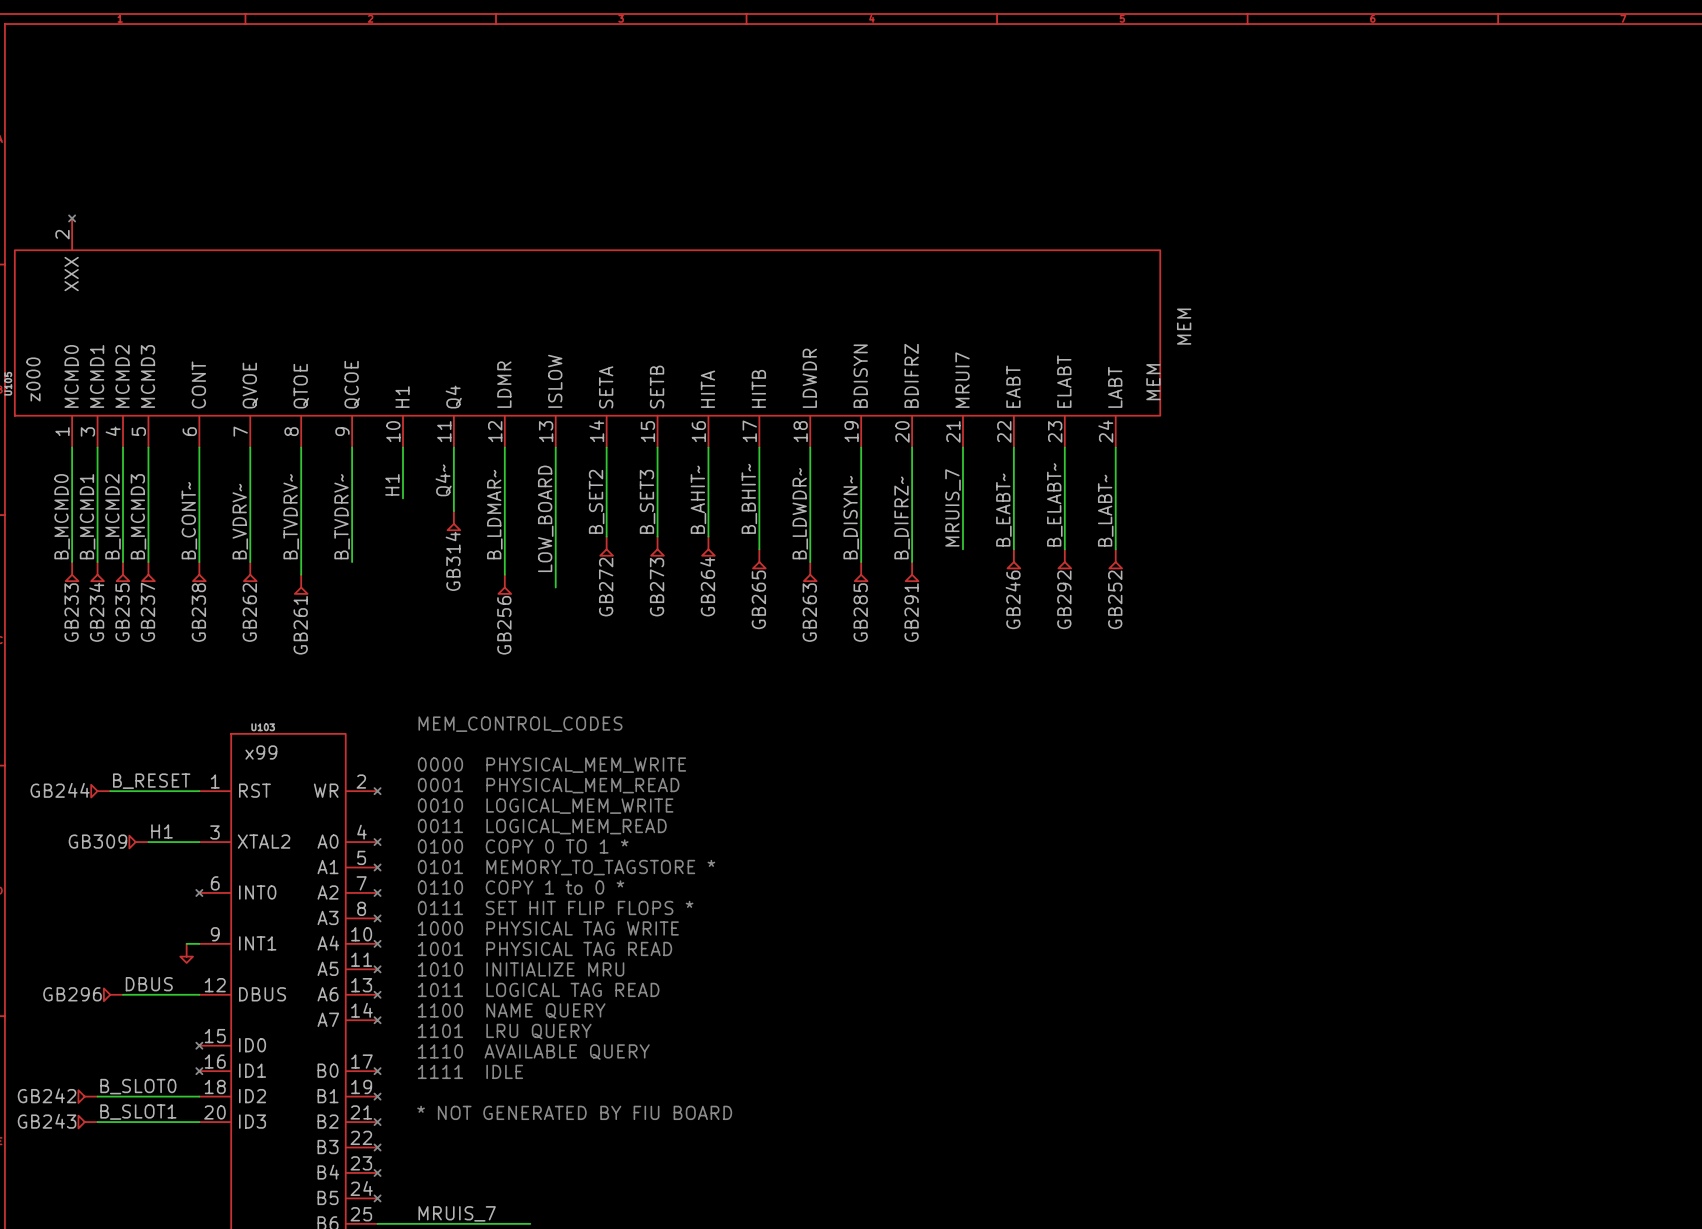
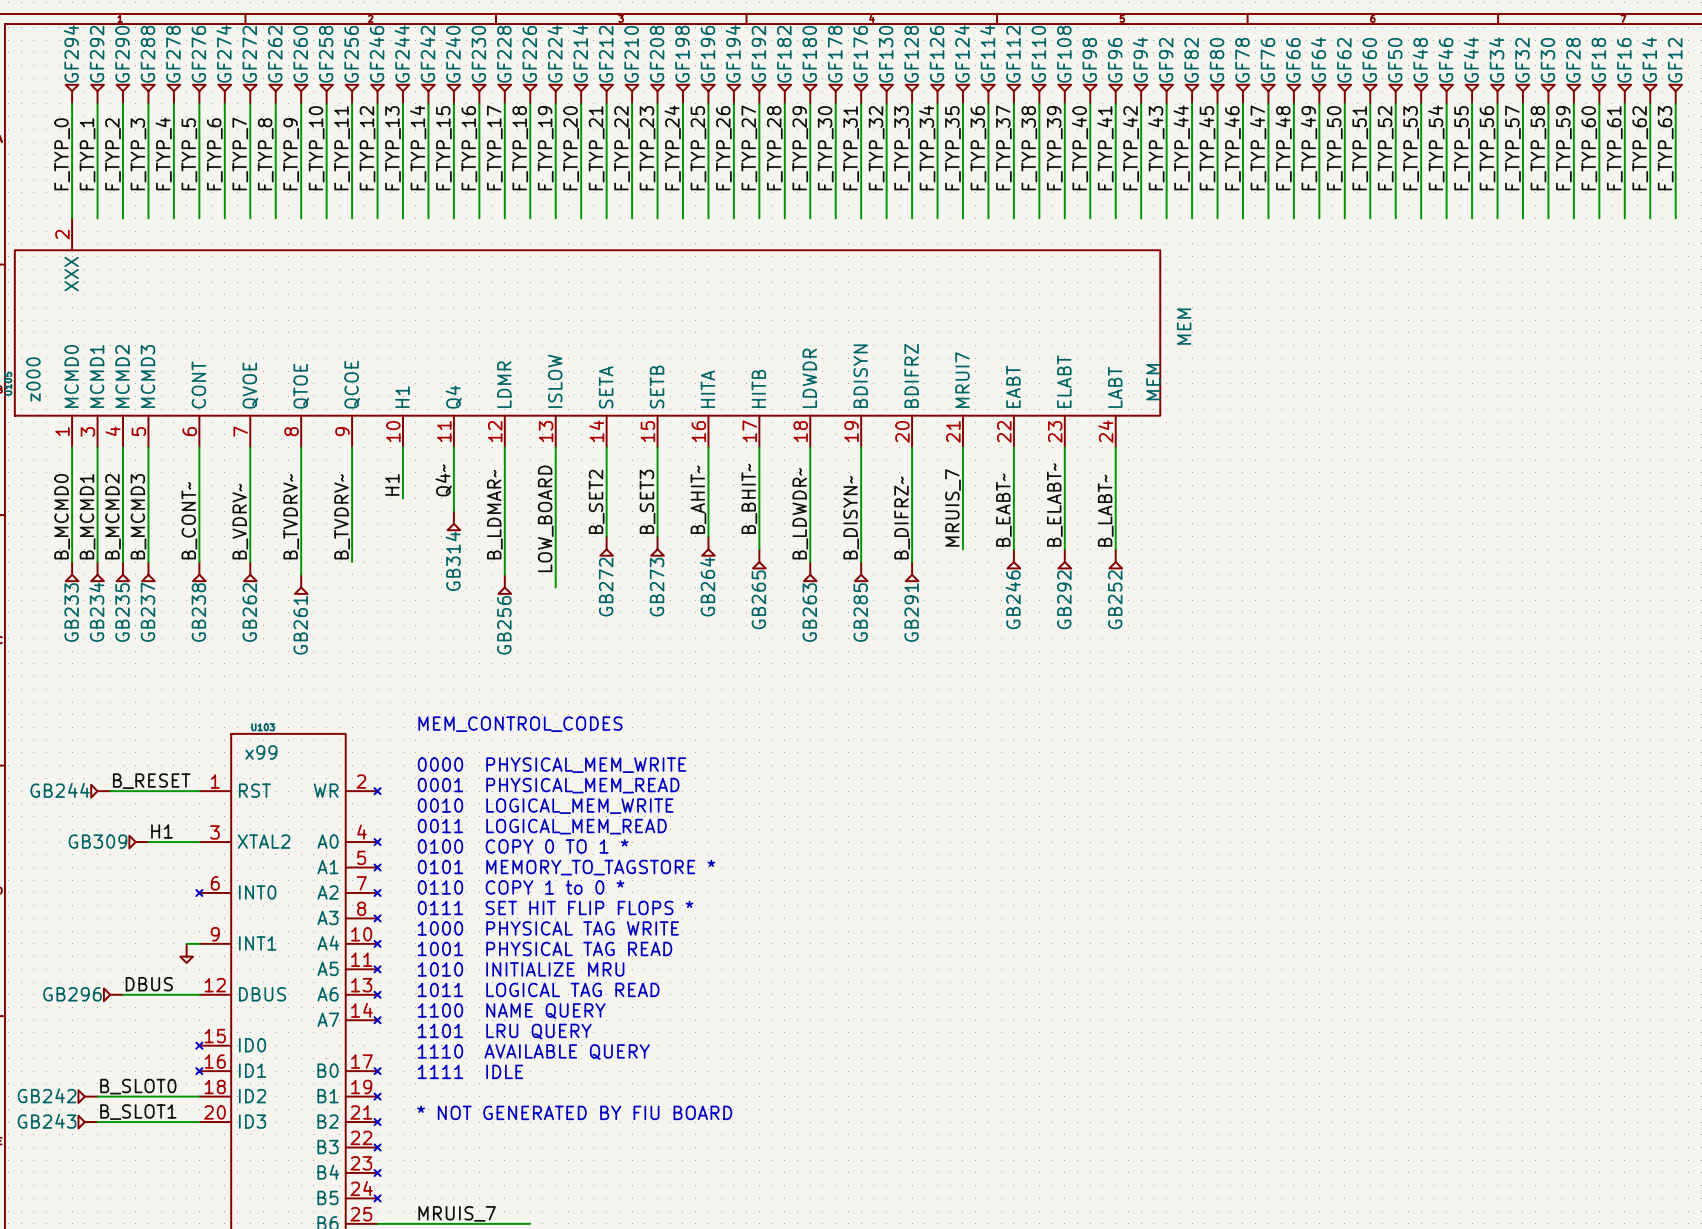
GF294: none -> (72, 94)
GF292: none -> (97, 94)
GF290: none -> (123, 94)
GF288: none -> (148, 94)
GF278: none -> (173, 94)
GF276: none -> (199, 94)
GF274: none -> (224, 94)
GF272: none -> (250, 94)
GF262: none -> (275, 94)
GF260: none -> (301, 94)
GF258: none -> (326, 94)
GF256: none -> (352, 94)
GF246: none -> (377, 94)
GF244: none -> (403, 94)
GF242: none -> (428, 94)
GF240: none -> (453, 94)
GF230: none -> (479, 94)
GF228: none -> (504, 94)
GF226: none -> (530, 94)
GF224: none -> (555, 94)
GF214: none -> (581, 94)
GF212: none -> (606, 94)
GF210: none -> (632, 94)
GF208: none -> (657, 94)
GF198: none -> (682, 94)
GF196: none -> (708, 94)
GF194: none -> (733, 94)
GF192: none -> (759, 94)
GF182: none -> (784, 94)
GF180: none -> (810, 94)
GF178: none -> (835, 94)
GF176: none -> (861, 94)
GF130: none -> (886, 94)
GF128: none -> (912, 94)
GF126: none -> (937, 94)
GF124: none -> (962, 94)
GF114: none -> (988, 94)
GF112: none -> (1013, 94)
GF110: none -> (1039, 94)
GF108: none -> (1064, 94)
GF98: none -> (1090, 94)
GF96: none -> (1115, 94)
GF94: none -> (1141, 94)
GF92: none -> (1166, 94)
GF82: none -> (1192, 94)
GF80: none -> (1217, 94)
GF78: none -> (1242, 94)
GF76: none -> (1268, 94)
GF66: none -> (1293, 94)
GF64: none -> (1319, 94)
GF62: none -> (1344, 94)
GF60: none -> (1370, 94)
GF50: none -> (1395, 94)
GF48: none -> (1421, 94)
GF46: none -> (1446, 94)
GF44: none -> (1472, 94)
GF34: none -> (1497, 94)
GF32: none -> (1522, 94)
GF30: none -> (1548, 94)
GF28: none -> (1573, 94)
GF18: none -> (1599, 94)
GF16: none -> (1624, 94)
GF14: none -> (1650, 94)
GF12: none -> (1675, 94)
wire: none -> (72, 103) (72, 218)
wire: none -> (97, 103) (97, 218)
wire: none -> (123, 103) (123, 218)
wire: none -> (148, 103) (148, 218)
wire: none -> (173, 103) (173, 218)
wire: none -> (199, 103) (199, 218)
wire: none -> (224, 103) (224, 218)
wire: none -> (250, 103) (250, 218)
wire: none -> (275, 103) (275, 218)
wire: none -> (301, 103) (301, 218)
wire: none -> (326, 103) (326, 218)
wire: none -> (352, 103) (352, 218)
wire: none -> (377, 103) (377, 218)
wire: none -> (403, 103) (403, 218)
wire: none -> (428, 103) (428, 218)
wire: none -> (453, 103) (453, 218)
wire: none -> (479, 103) (479, 218)
wire: none -> (504, 103) (504, 218)
wire: none -> (530, 103) (530, 218)
wire: none -> (555, 103) (555, 218)
wire: none -> (581, 103) (581, 218)
wire: none -> (606, 103) (606, 218)
wire: none -> (632, 103) (632, 218)
wire: none -> (657, 103) (657, 218)
wire: none -> (682, 103) (682, 218)
wire: none -> (708, 103) (708, 218)
wire: none -> (733, 103) (733, 218)
wire: none -> (759, 103) (759, 218)
wire: none -> (784, 103) (784, 218)
wire: none -> (810, 103) (810, 218)
wire: none -> (835, 103) (835, 218)
wire: none -> (861, 103) (861, 218)
wire: none -> (886, 103) (886, 218)
wire: none -> (912, 103) (912, 218)
wire: none -> (937, 103) (937, 218)
wire: none -> (962, 103) (962, 218)
wire: none -> (988, 103) (988, 218)
wire: none -> (1013, 103) (1013, 218)
wire: none -> (1039, 103) (1039, 218)
wire: none -> (1064, 103) (1064, 218)
wire: none -> (1090, 103) (1090, 218)
wire: none -> (1115, 103) (1115, 218)
wire: none -> (1141, 103) (1141, 218)
wire: none -> (1166, 103) (1166, 218)
wire: none -> (1192, 103) (1192, 218)
wire: none -> (1217, 103) (1217, 218)
wire: none -> (1242, 103) (1242, 218)
wire: none -> (1268, 103) (1268, 218)
wire: none -> (1293, 103) (1293, 218)
wire: none -> (1319, 103) (1319, 218)
wire: none -> (1344, 103) (1344, 218)
wire: none -> (1370, 103) (1370, 218)
wire: none -> (1395, 103) (1395, 218)
wire: none -> (1421, 103) (1421, 218)
wire: none -> (1446, 103) (1446, 218)
wire: none -> (1472, 103) (1472, 218)
wire: none -> (1497, 103) (1497, 218)
wire: none -> (1522, 103) (1522, 218)
wire: none -> (1548, 103) (1548, 218)
wire: none -> (1573, 103) (1573, 218)
wire: none -> (1599, 103) (1599, 218)
wire: none -> (1624, 103) (1624, 218)
wire: none -> (1650, 103) (1650, 218)
wire: none -> (1675, 103) (1675, 218)
label: none -> F_TYP_14 (418, 147)
label: none -> F_TYP_17 (494, 147)
label: none -> F_TYP_24 (672, 147)
label: none -> F_TYP_27 (749, 147)
label: none -> F_TYP_34 (927, 147)
label: none -> F_TYP_37 (1003, 147)
label: none -> F_TYP_44 (1181, 147)
label: none -> F_TYP_47 (1258, 147)
label: none -> F_TYP_54 (1436, 147)
label: none -> F_TYP_57 (1512, 147)
label: none -> F_TYP_10 (316, 148)
label: none -> F_TYP_11 (342, 148)
label: none -> F_TYP_12 (367, 148)
label: none -> F_TYP_13 (393, 148)
label: none -> F_TYP_15 (443, 148)
label: none -> F_TYP_16 (469, 148)
label: none -> F_TYP_18 (520, 148)
label: none -> F_TYP_19 (545, 148)
label: none -> F_TYP_20 (571, 148)
label: none -> F_TYP_21 (596, 148)
label: none -> F_TYP_22 (622, 148)
label: none -> F_TYP_23 (647, 148)
label: none -> F_TYP_25 (698, 148)
label: none -> F_TYP_26 (723, 148)
label: none -> F_TYP_28 (774, 148)
label: none -> F_TYP_29 (800, 148)
label: none -> F_TYP_30 (825, 148)
label: none -> F_TYP_31 (851, 148)
label: none -> F_TYP_32 (876, 148)
label: none -> F_TYP_33 (902, 148)
label: none -> F_TYP_35 (953, 148)
label: none -> F_TYP_36 (978, 148)
label: none -> F_TYP_38 (1029, 148)
label: none -> F_TYP_39 (1054, 148)
label: none -> F_TYP_40 (1079, 148)
label: none -> F_TYP_41 (1105, 148)
label: none -> F_TYP_42 (1130, 148)
label: none -> F_TYP_43 (1156, 148)
label: none -> F_TYP_45 (1207, 148)
label: none -> F_TYP_46 (1232, 148)
label: none -> F_TYP_48 (1283, 148)
label: none -> F_TYP_49 (1309, 148)
label: none -> F_TYP_50 (1334, 148)
label: none -> F_TYP_51 (1360, 148)
label: none -> F_TYP_52 (1385, 148)
label: none -> F_TYP_53 (1411, 148)
label: none -> F_TYP_55 (1462, 148)
label: none -> F_TYP_56 (1487, 148)
label: none -> F_TYP_58 (1538, 148)
label: none -> F_TYP_59 (1563, 148)
label: none -> F_TYP_60 (1589, 148)
label: none -> F_TYP_61 (1614, 148)
label: none -> F_TYP_62 (1640, 148)
label: none -> F_TYP_63 (1665, 148)
label: none -> F_TYP_4 (163, 153)
label: none -> F_TYP_7 (240, 153)
label: none -> F_TYP_0 (62, 154)
label: none -> F_TYP_1 (87, 154)
label: none -> F_TYP_2 (113, 154)
label: none -> F_TYP_3 (138, 154)
label: none -> F_TYP_5 (189, 154)
label: none -> F_TYP_6 (214, 154)
label: none -> F_TYP_8 (265, 154)
label: none -> F_TYP_9 (291, 154)
no-connect mark: (72, 218) -> none

